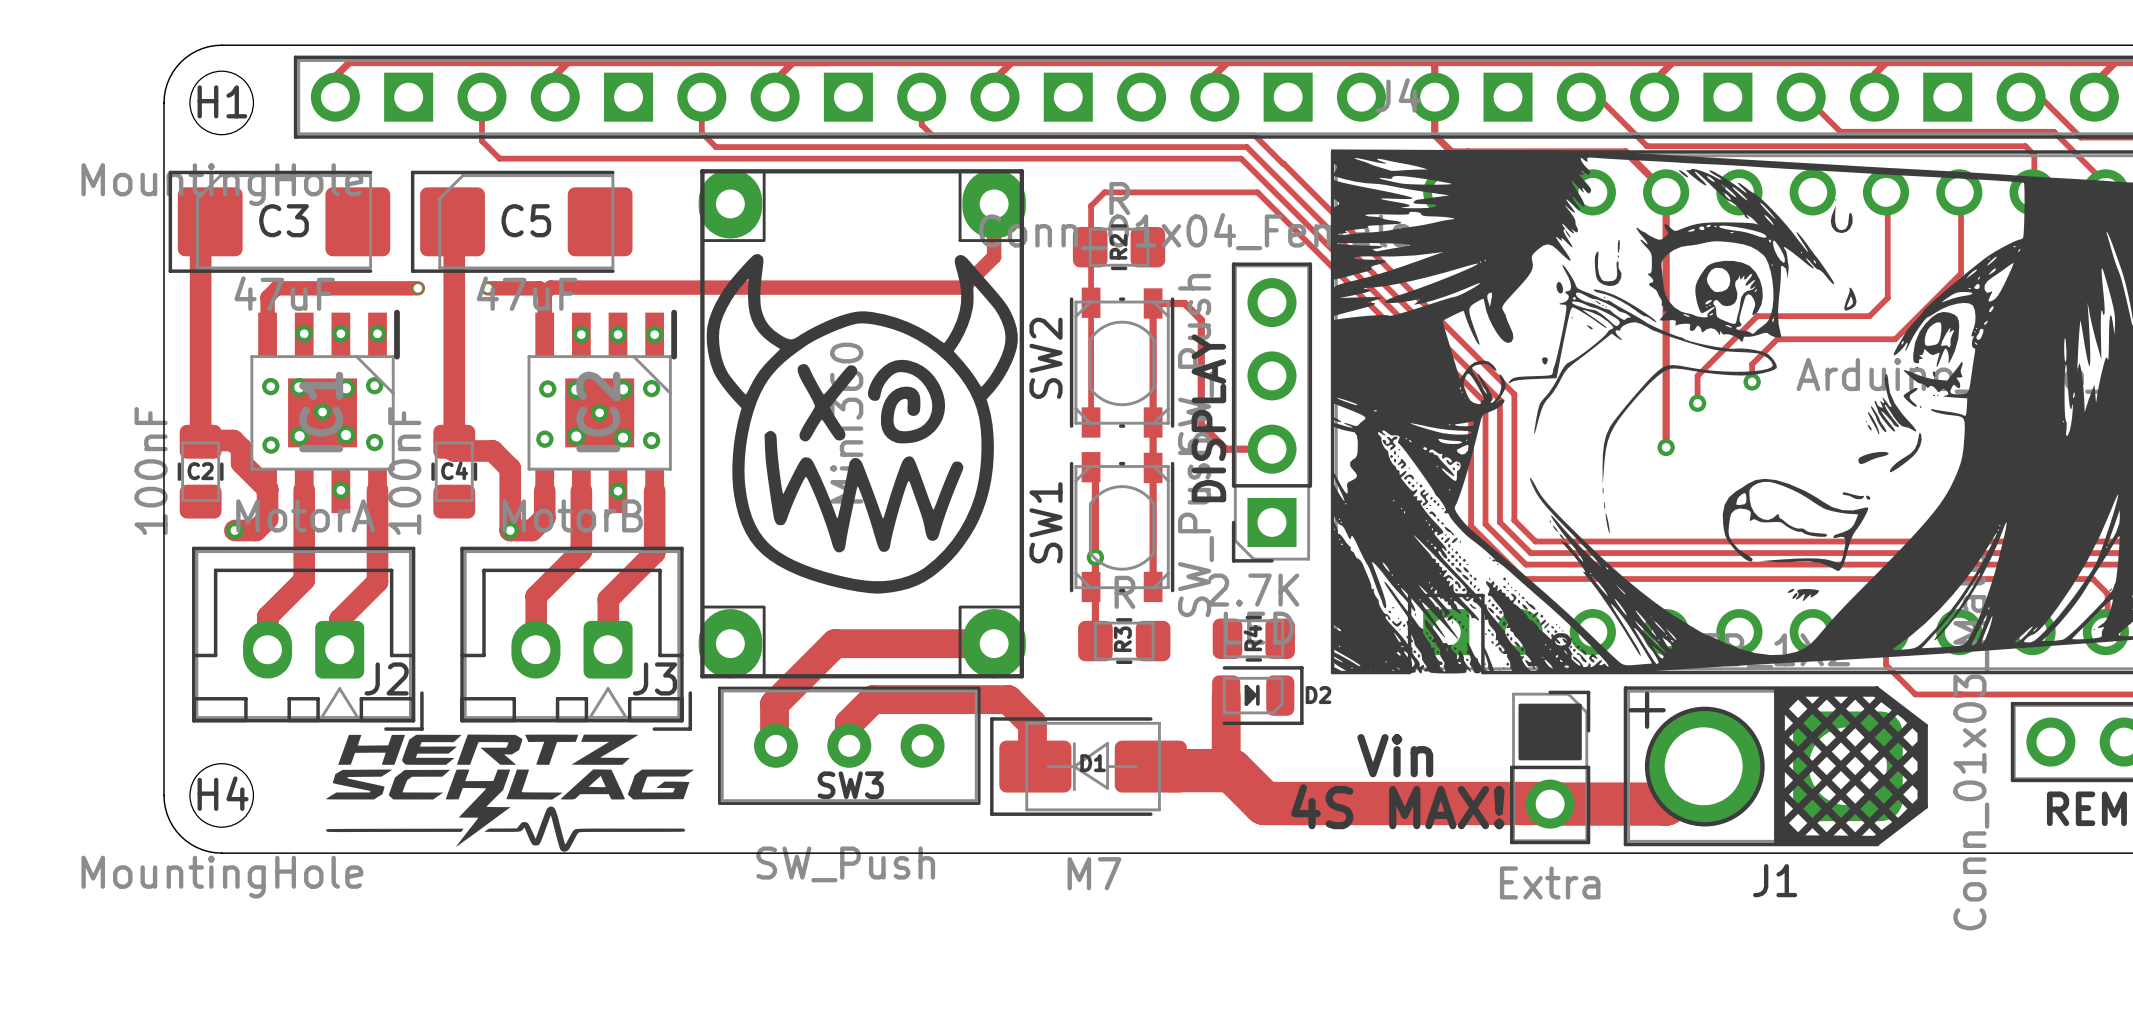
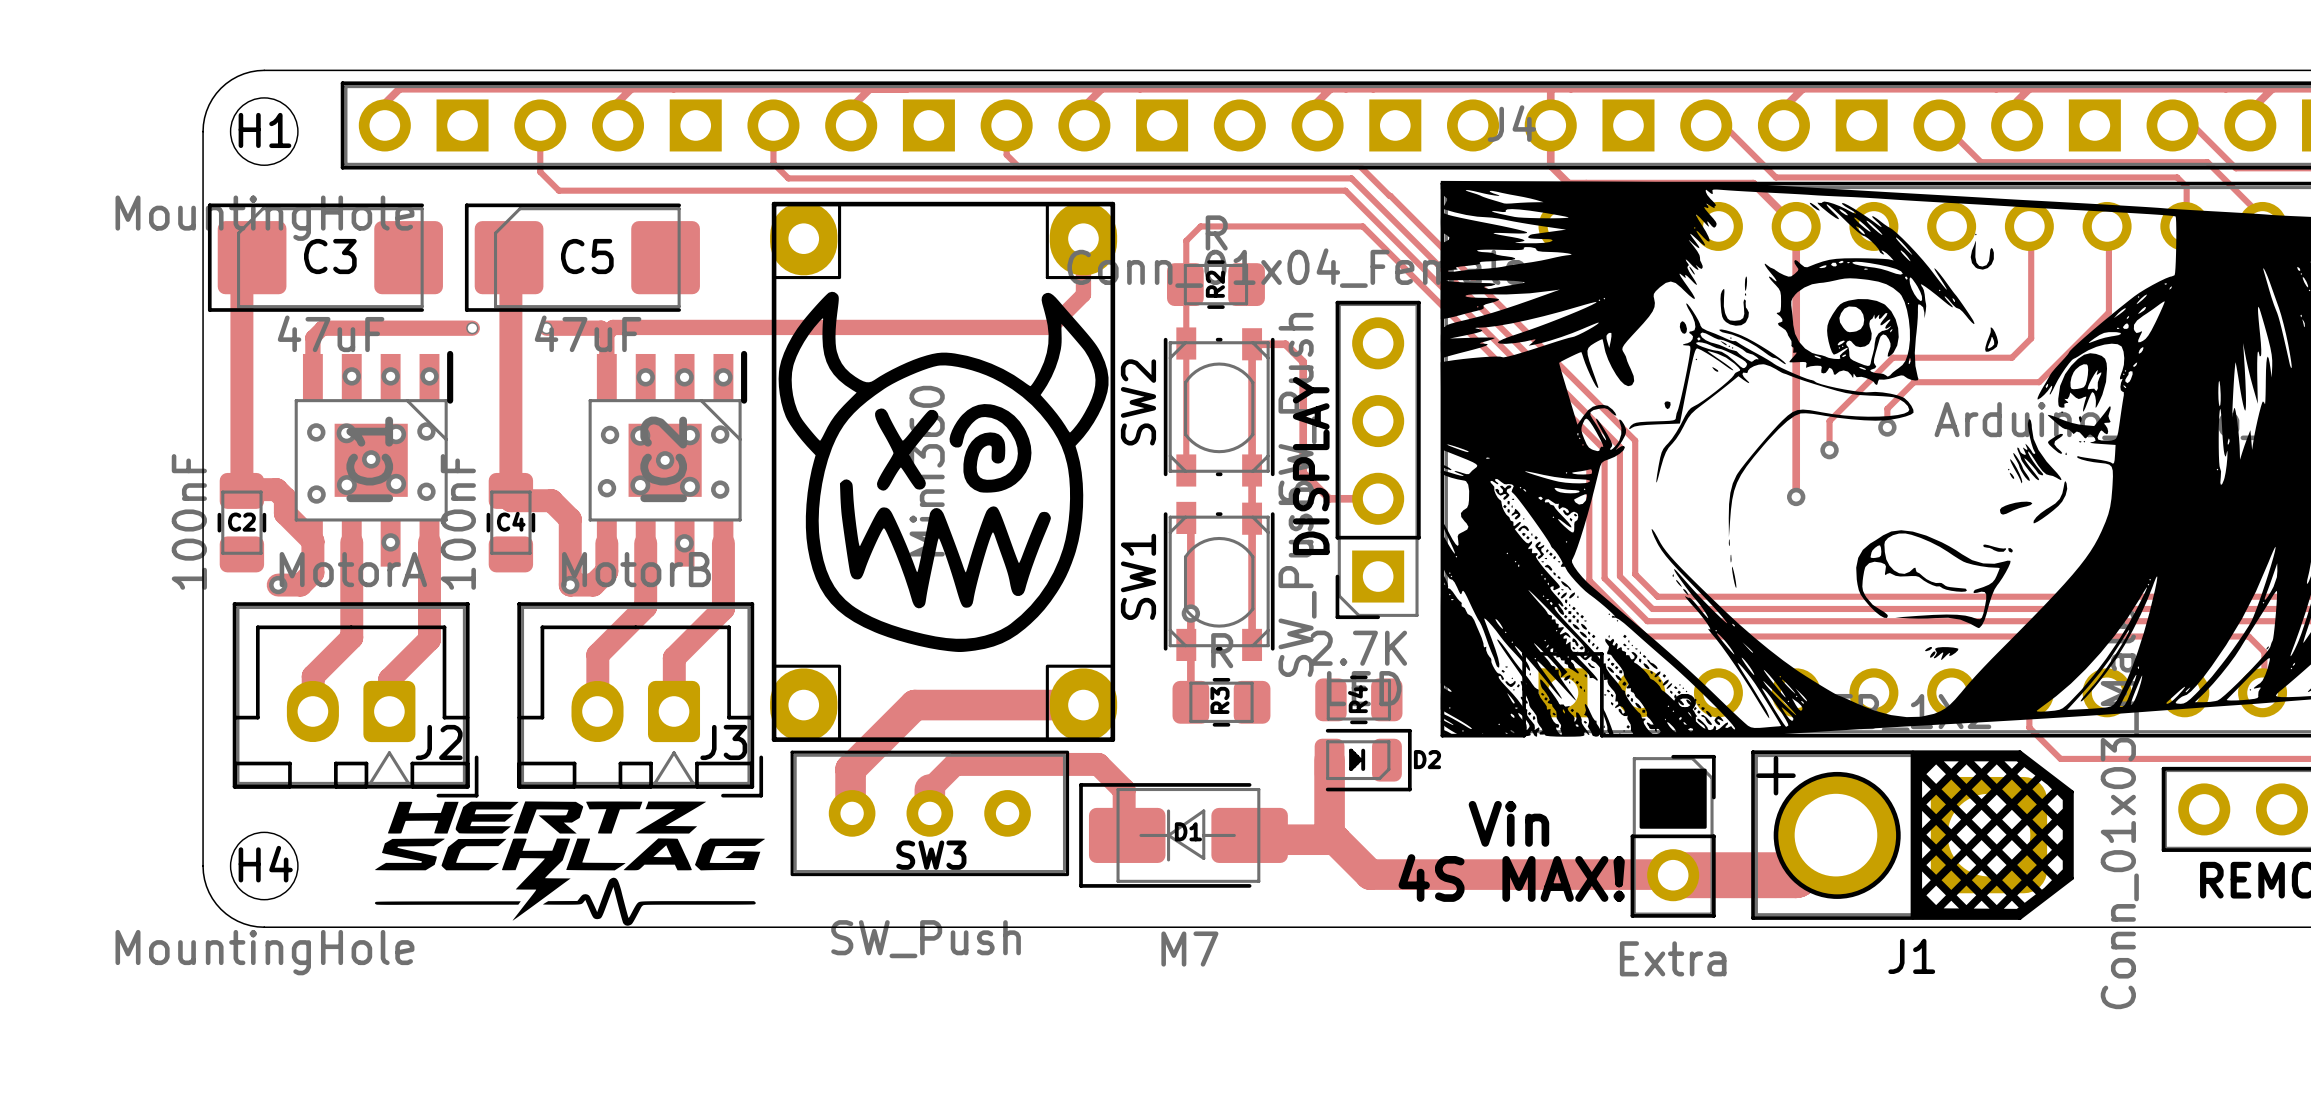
track width: thick (849, 723) (872, 699) (1008, 699) (1032, 723) (1032, 748) -> thin (929, 789) (954, 764) (1098, 764) (1124, 790) (1124, 816)
track width: thick (1169, 770) (1231, 770) (1264, 803) (1549, 803) -> thin (1269, 839) (1335, 839) (1370, 874) (1672, 874)

